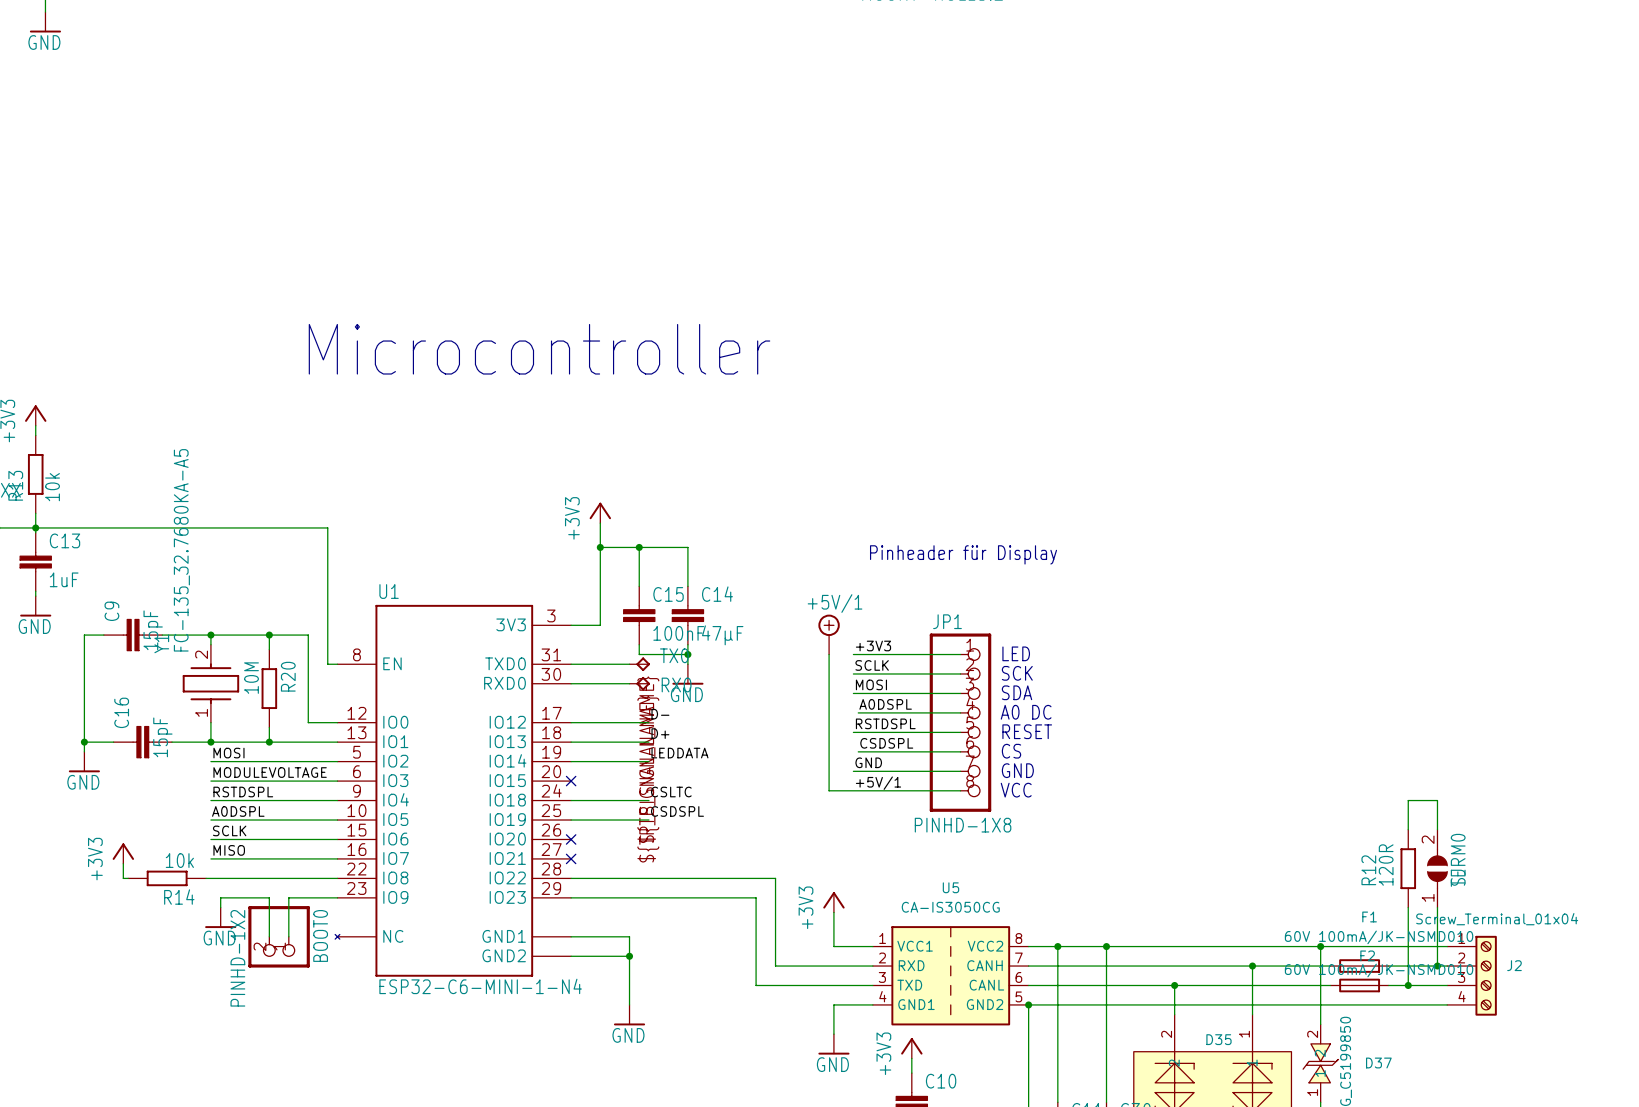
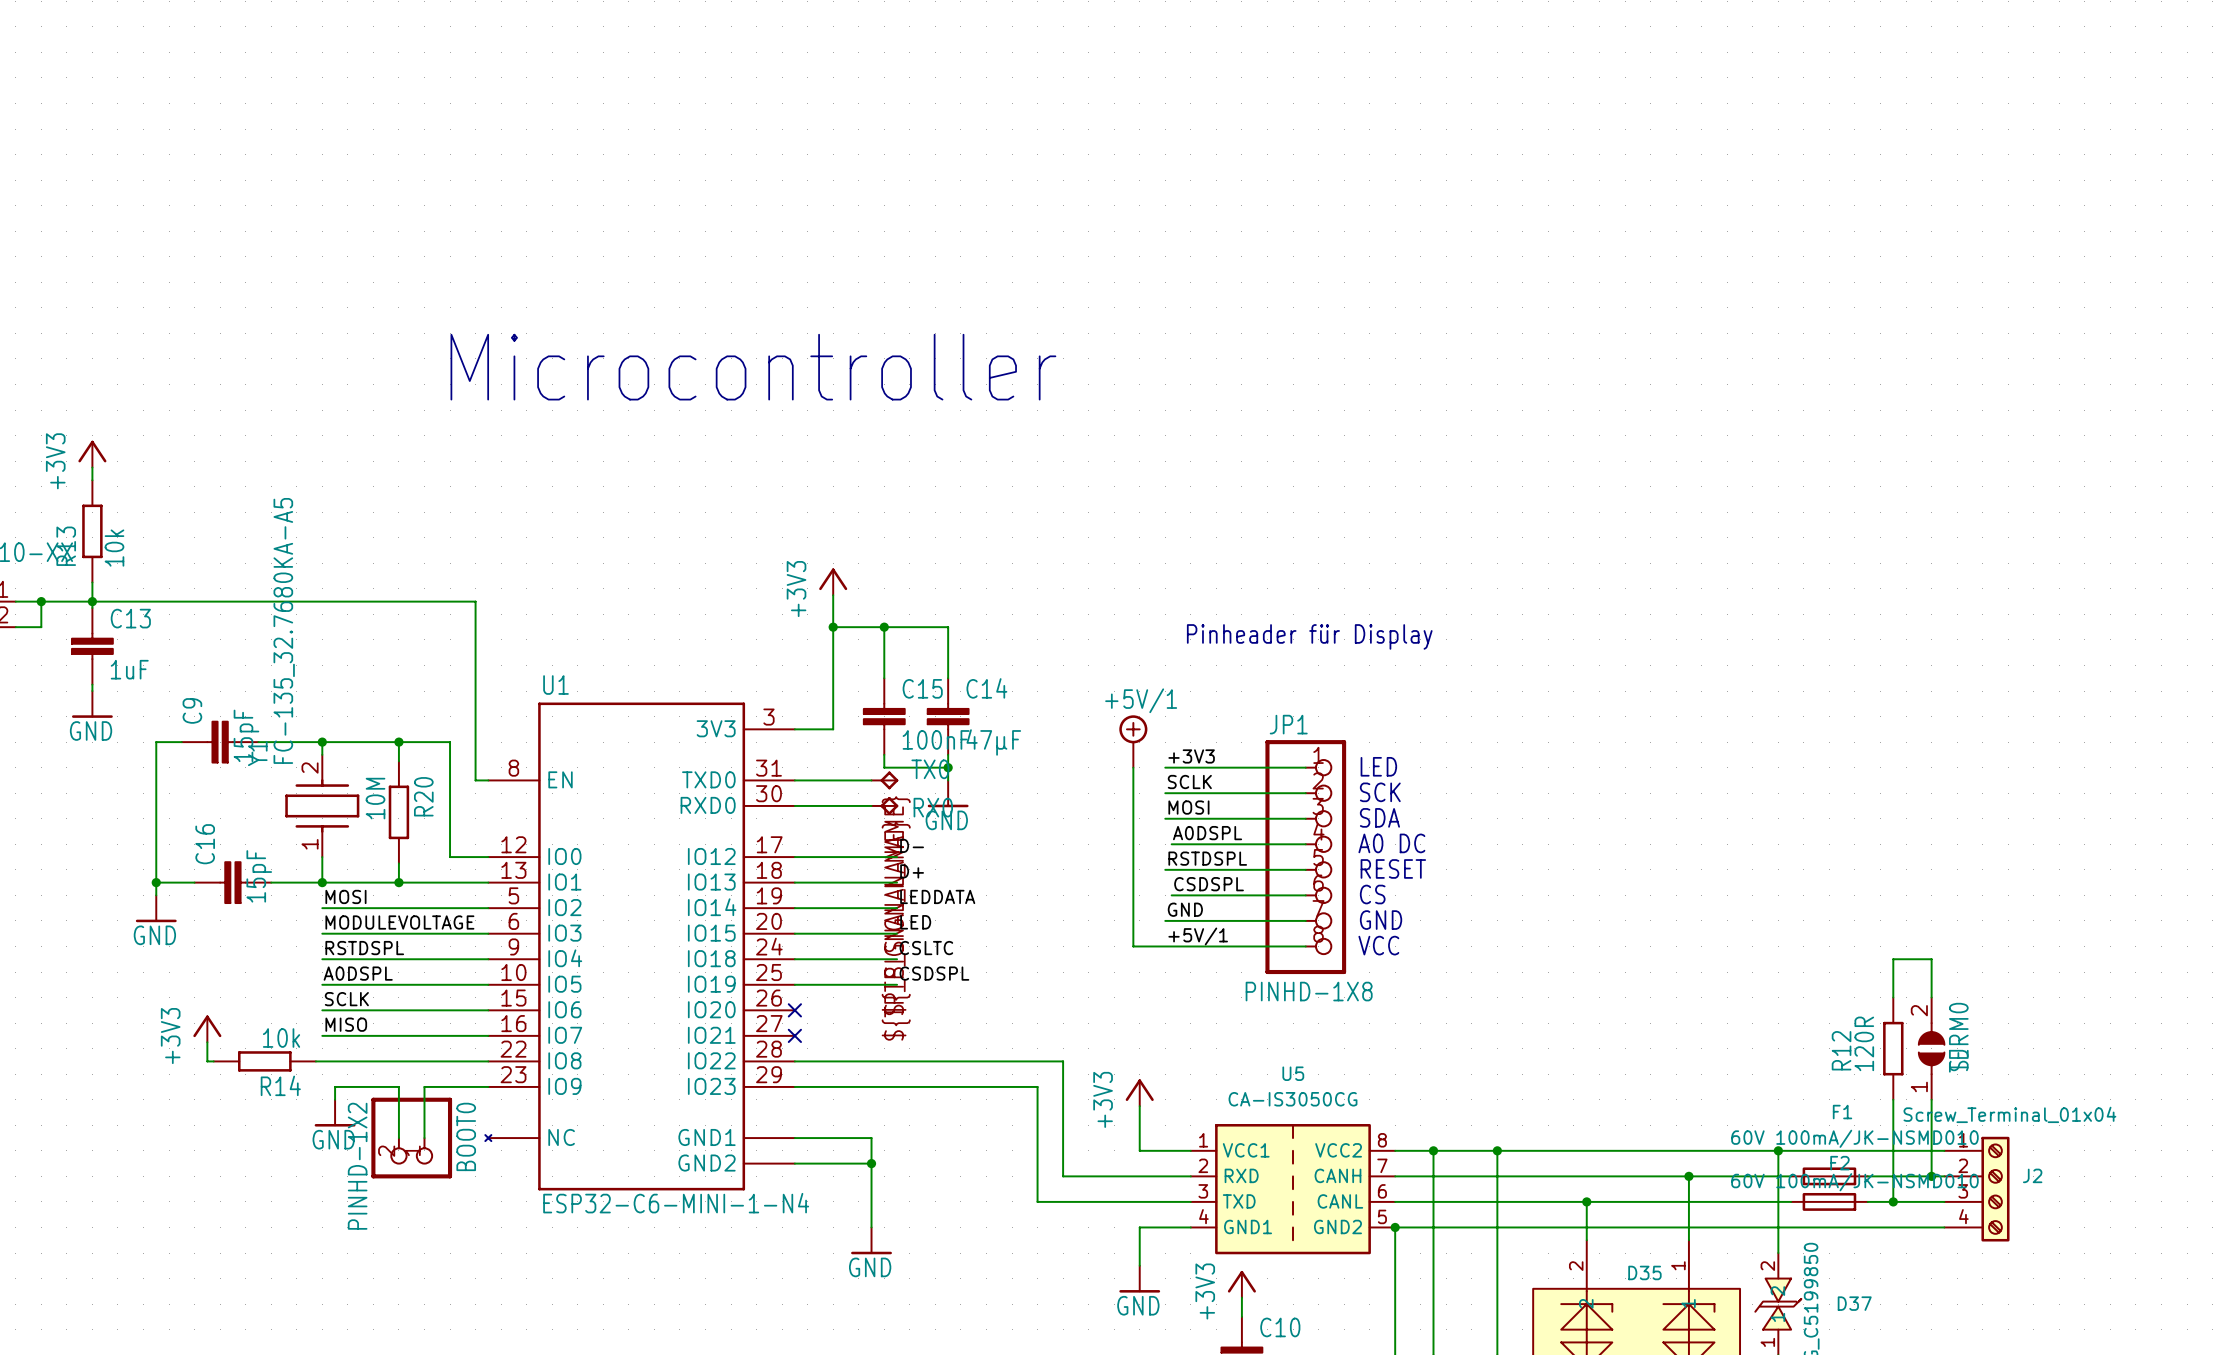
label: none -> LED (915, 922)
wire: none -> (794, 933) (897, 933)
no-connect mark: (571, 781) -> none

